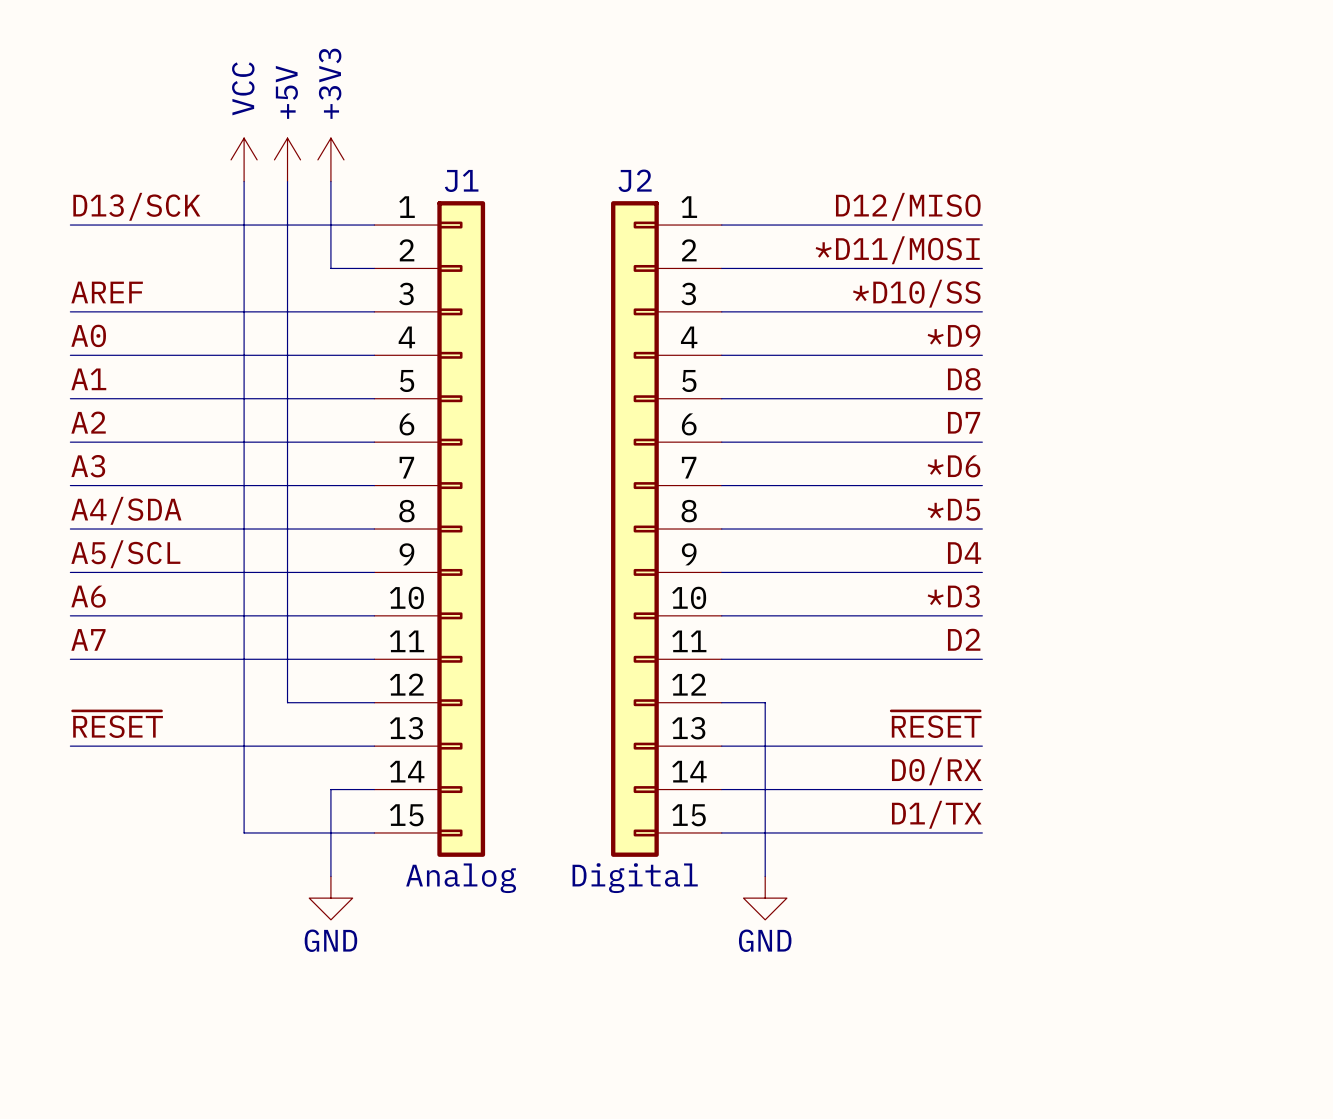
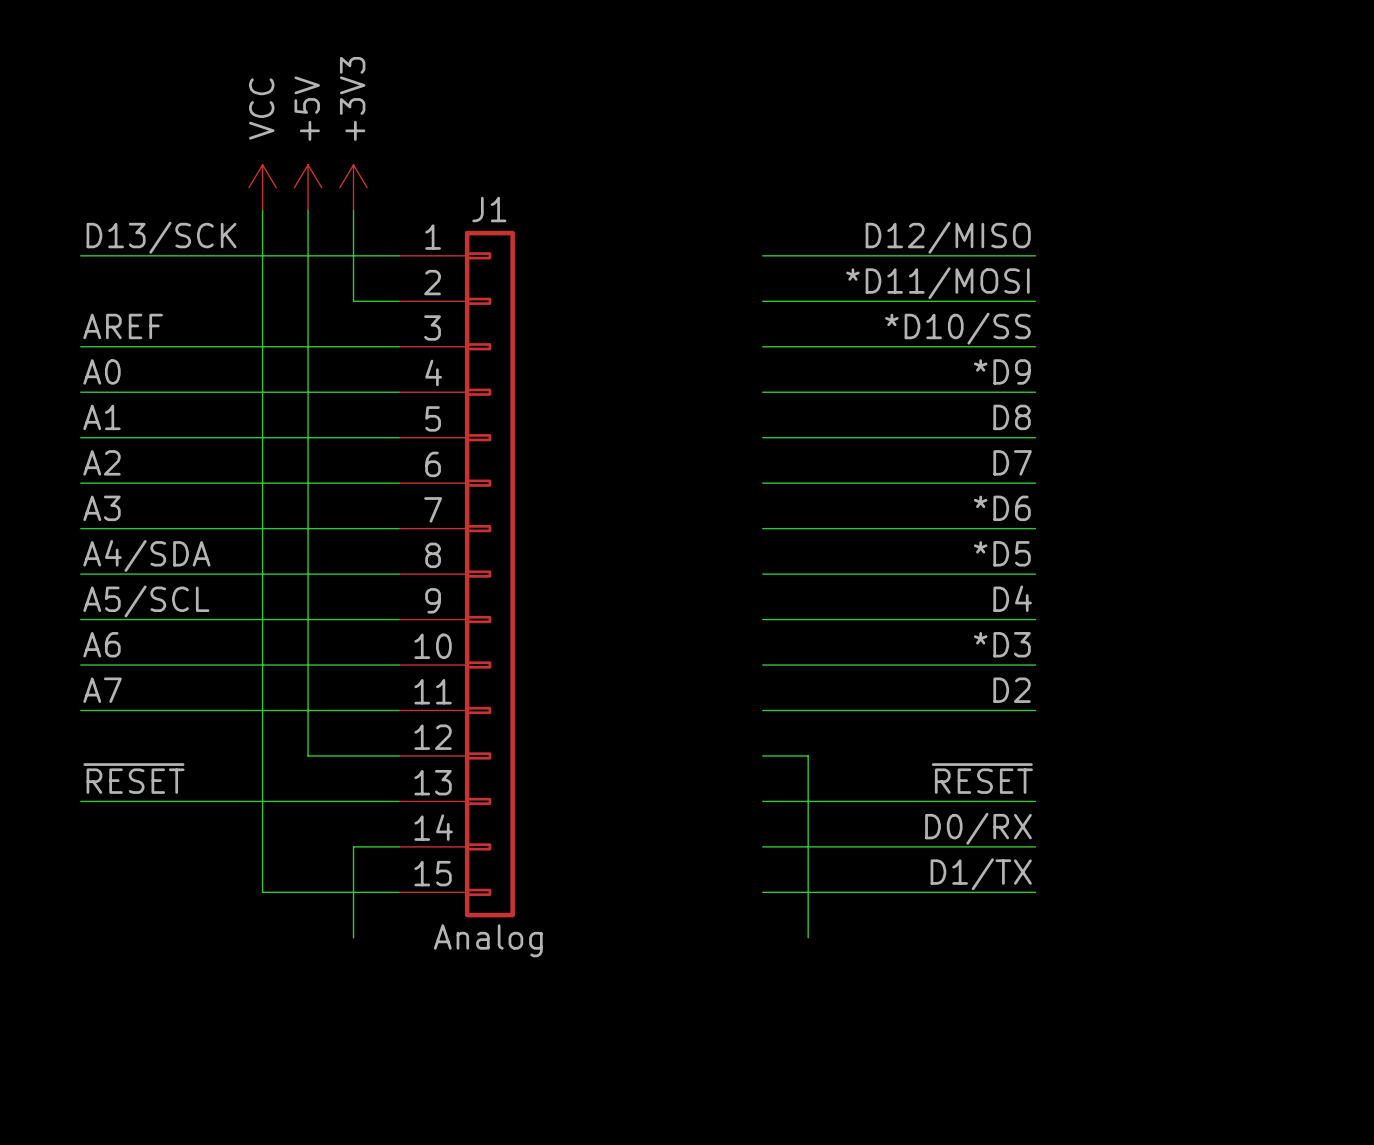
J2: Digital (666, 529) -> none
power symbol: GND (330, 898) -> none
power symbol: GND (765, 898) -> none

